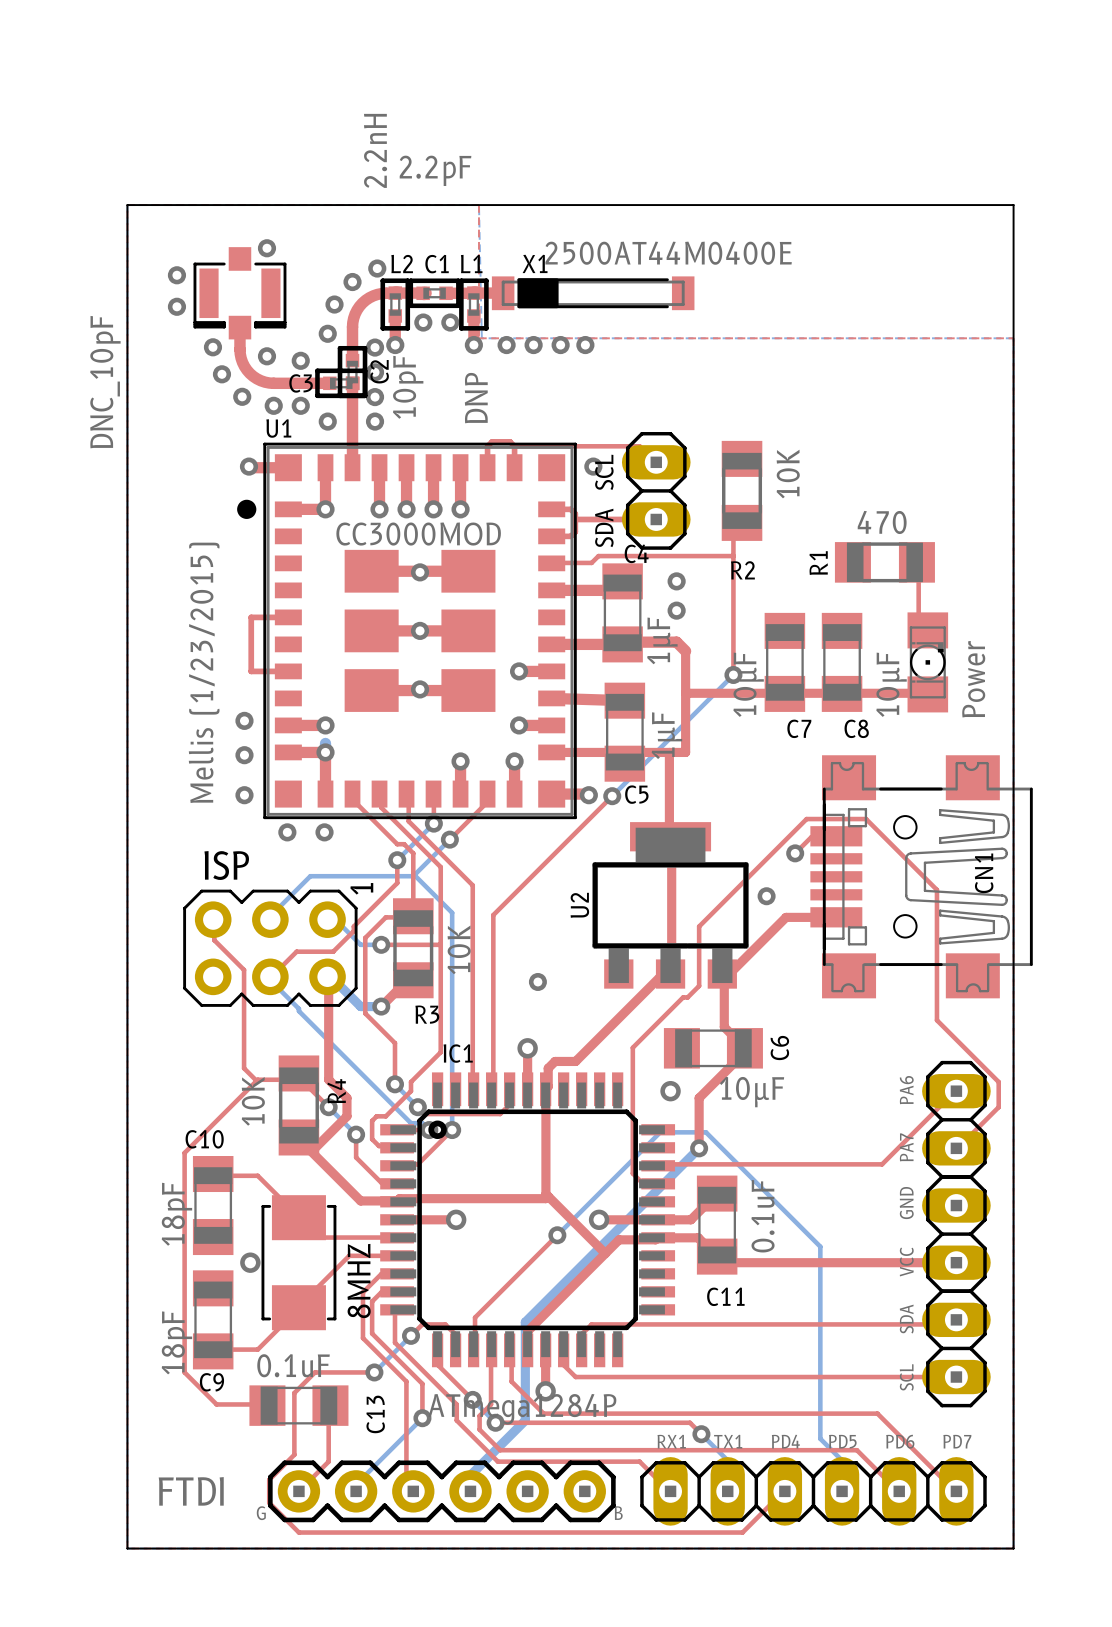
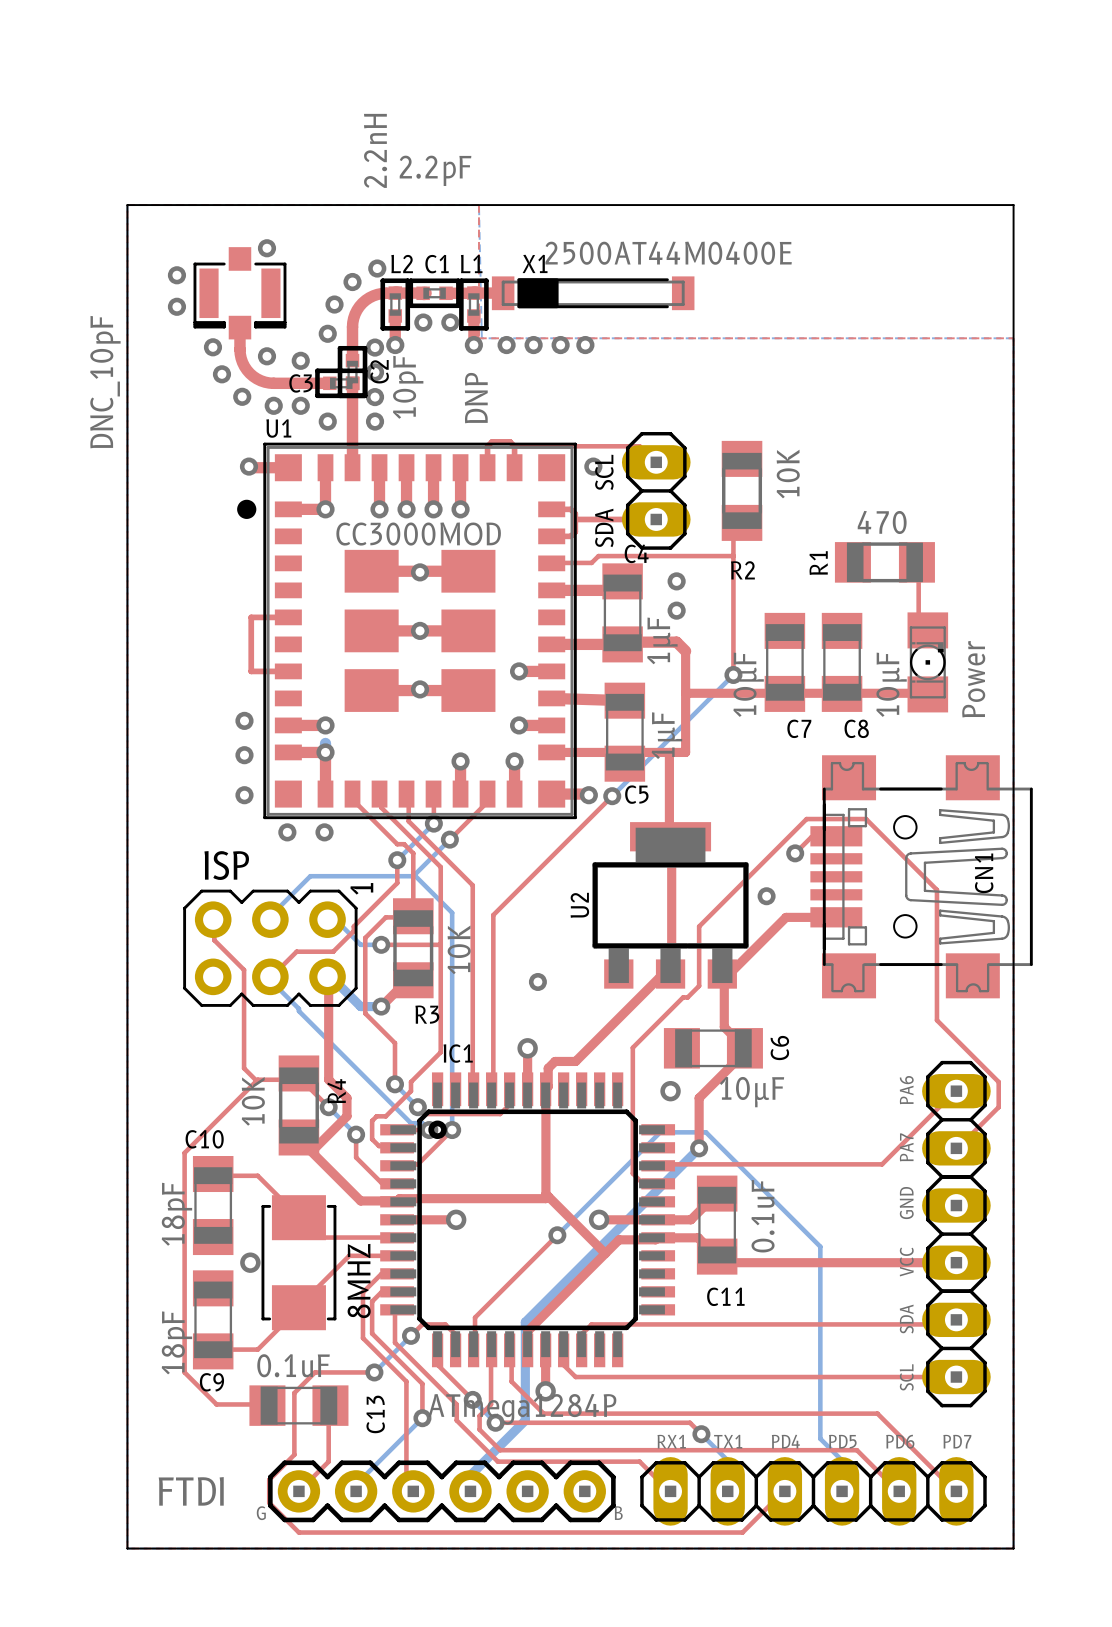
text: Mellis (1/23/2015) (204, 672) -> none

